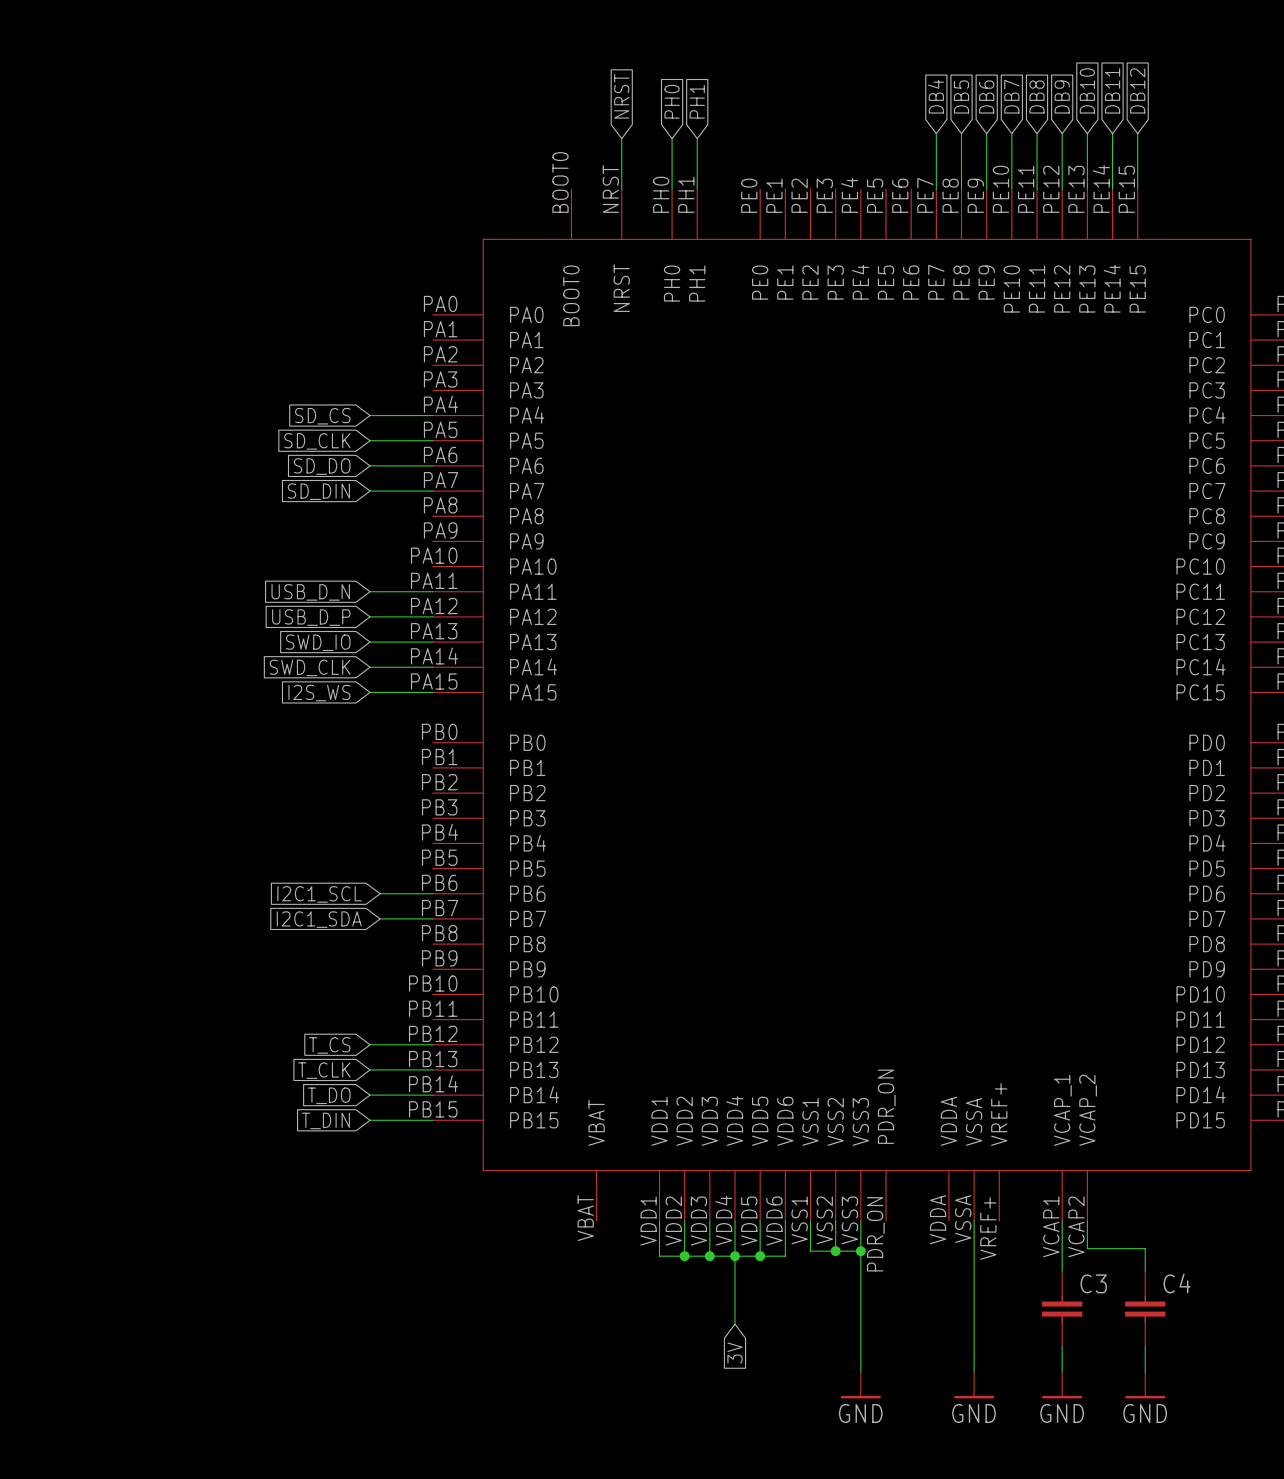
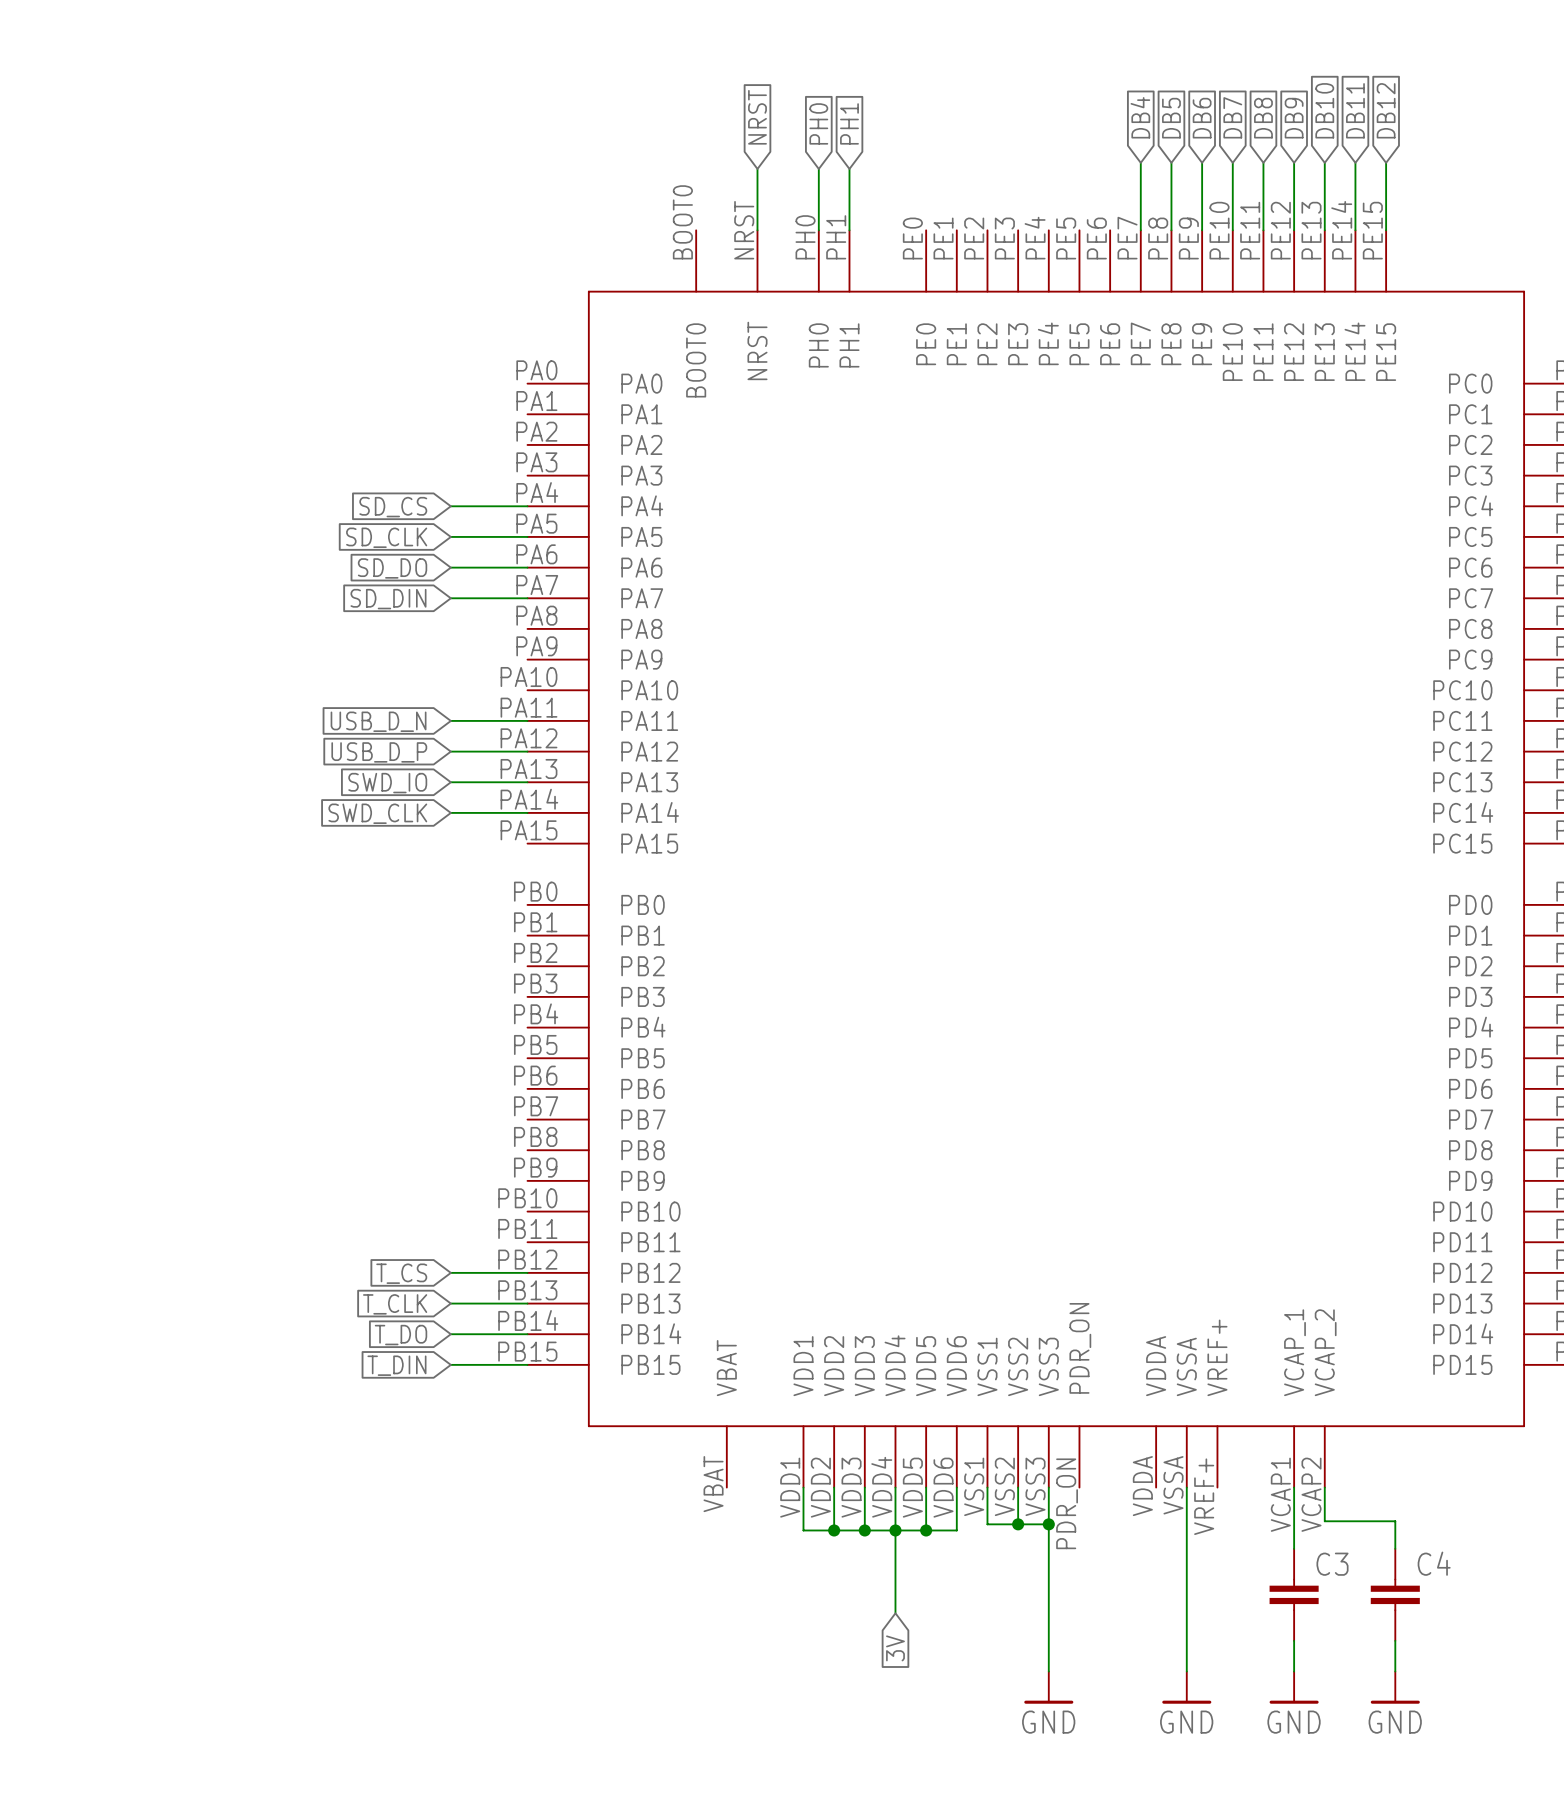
wire: (370, 692) (432, 692) -> none
global label: I2S_WS (319, 693) -> none
wire: (380, 893) (432, 893) -> none
global label: I2C1_SCL (319, 894) -> none
wire: (380, 918) (432, 918) -> none
global label: I2C1_SDA (319, 919) -> none

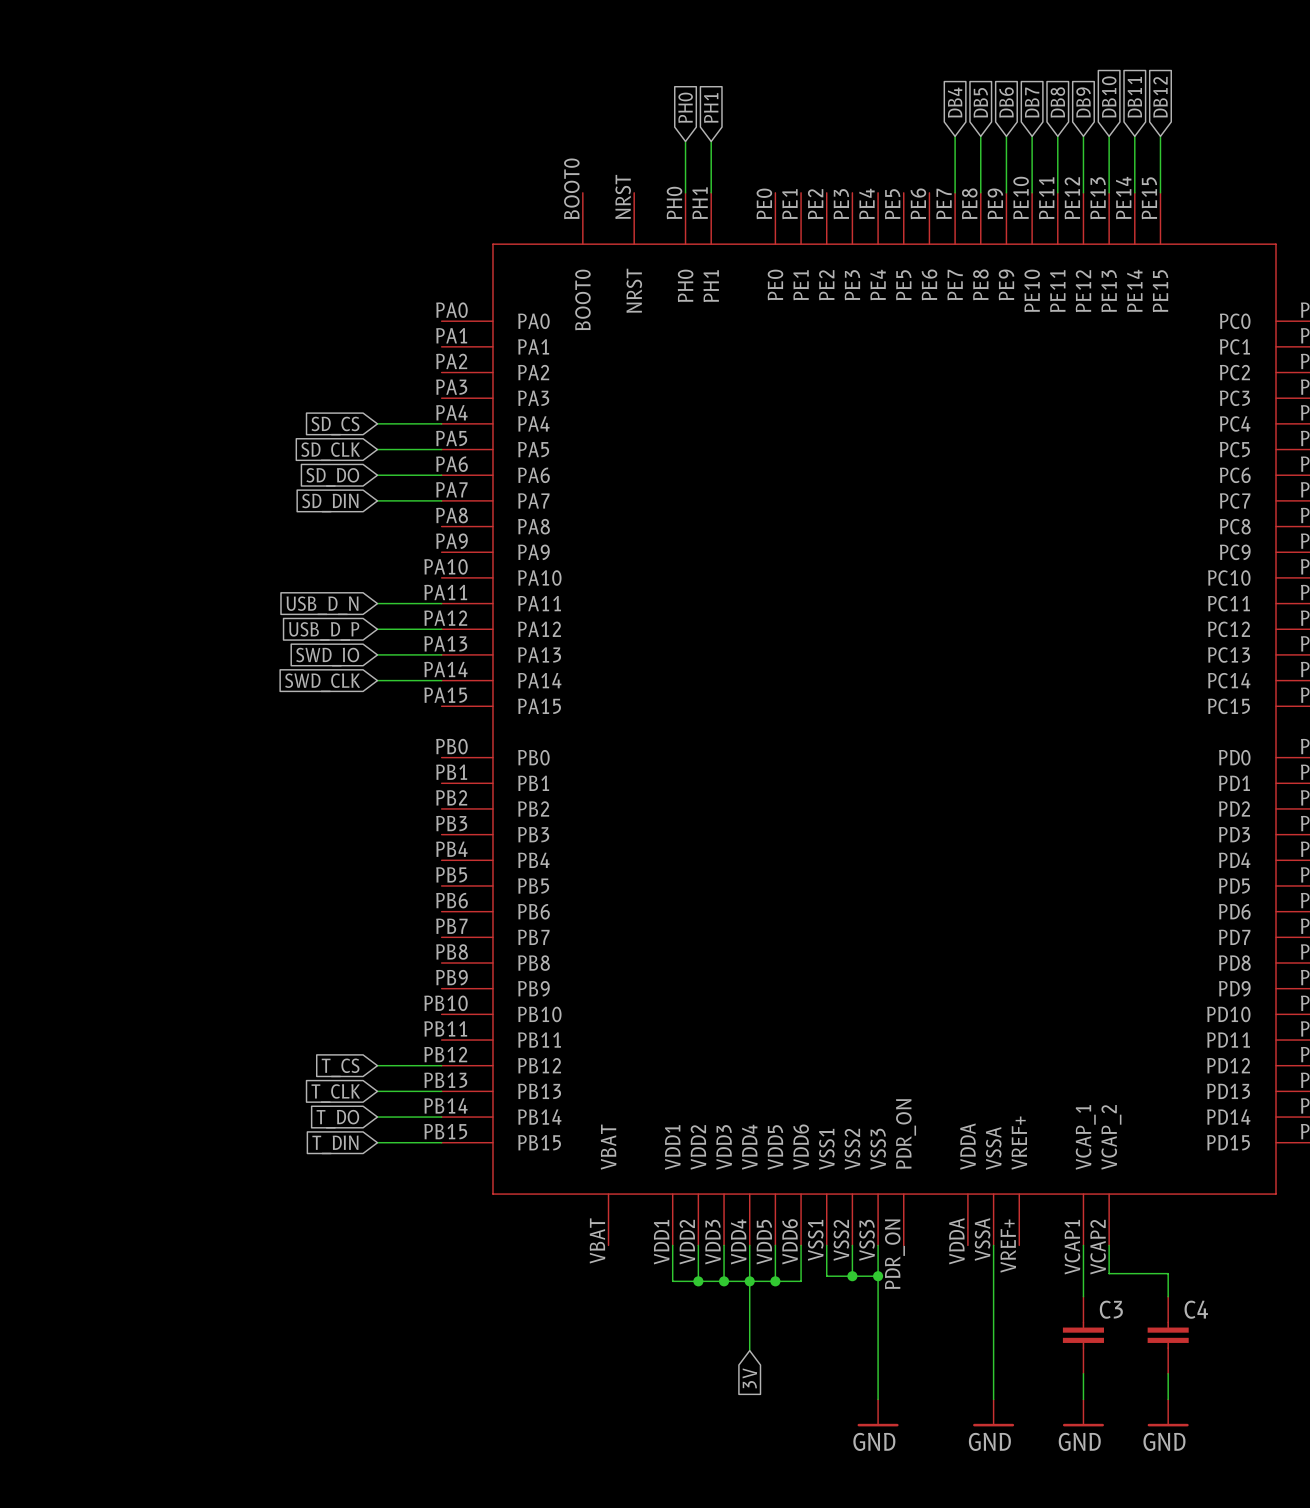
global label: NRST (757, 117) -> none
wire: (757, 168) (757, 230) -> none

